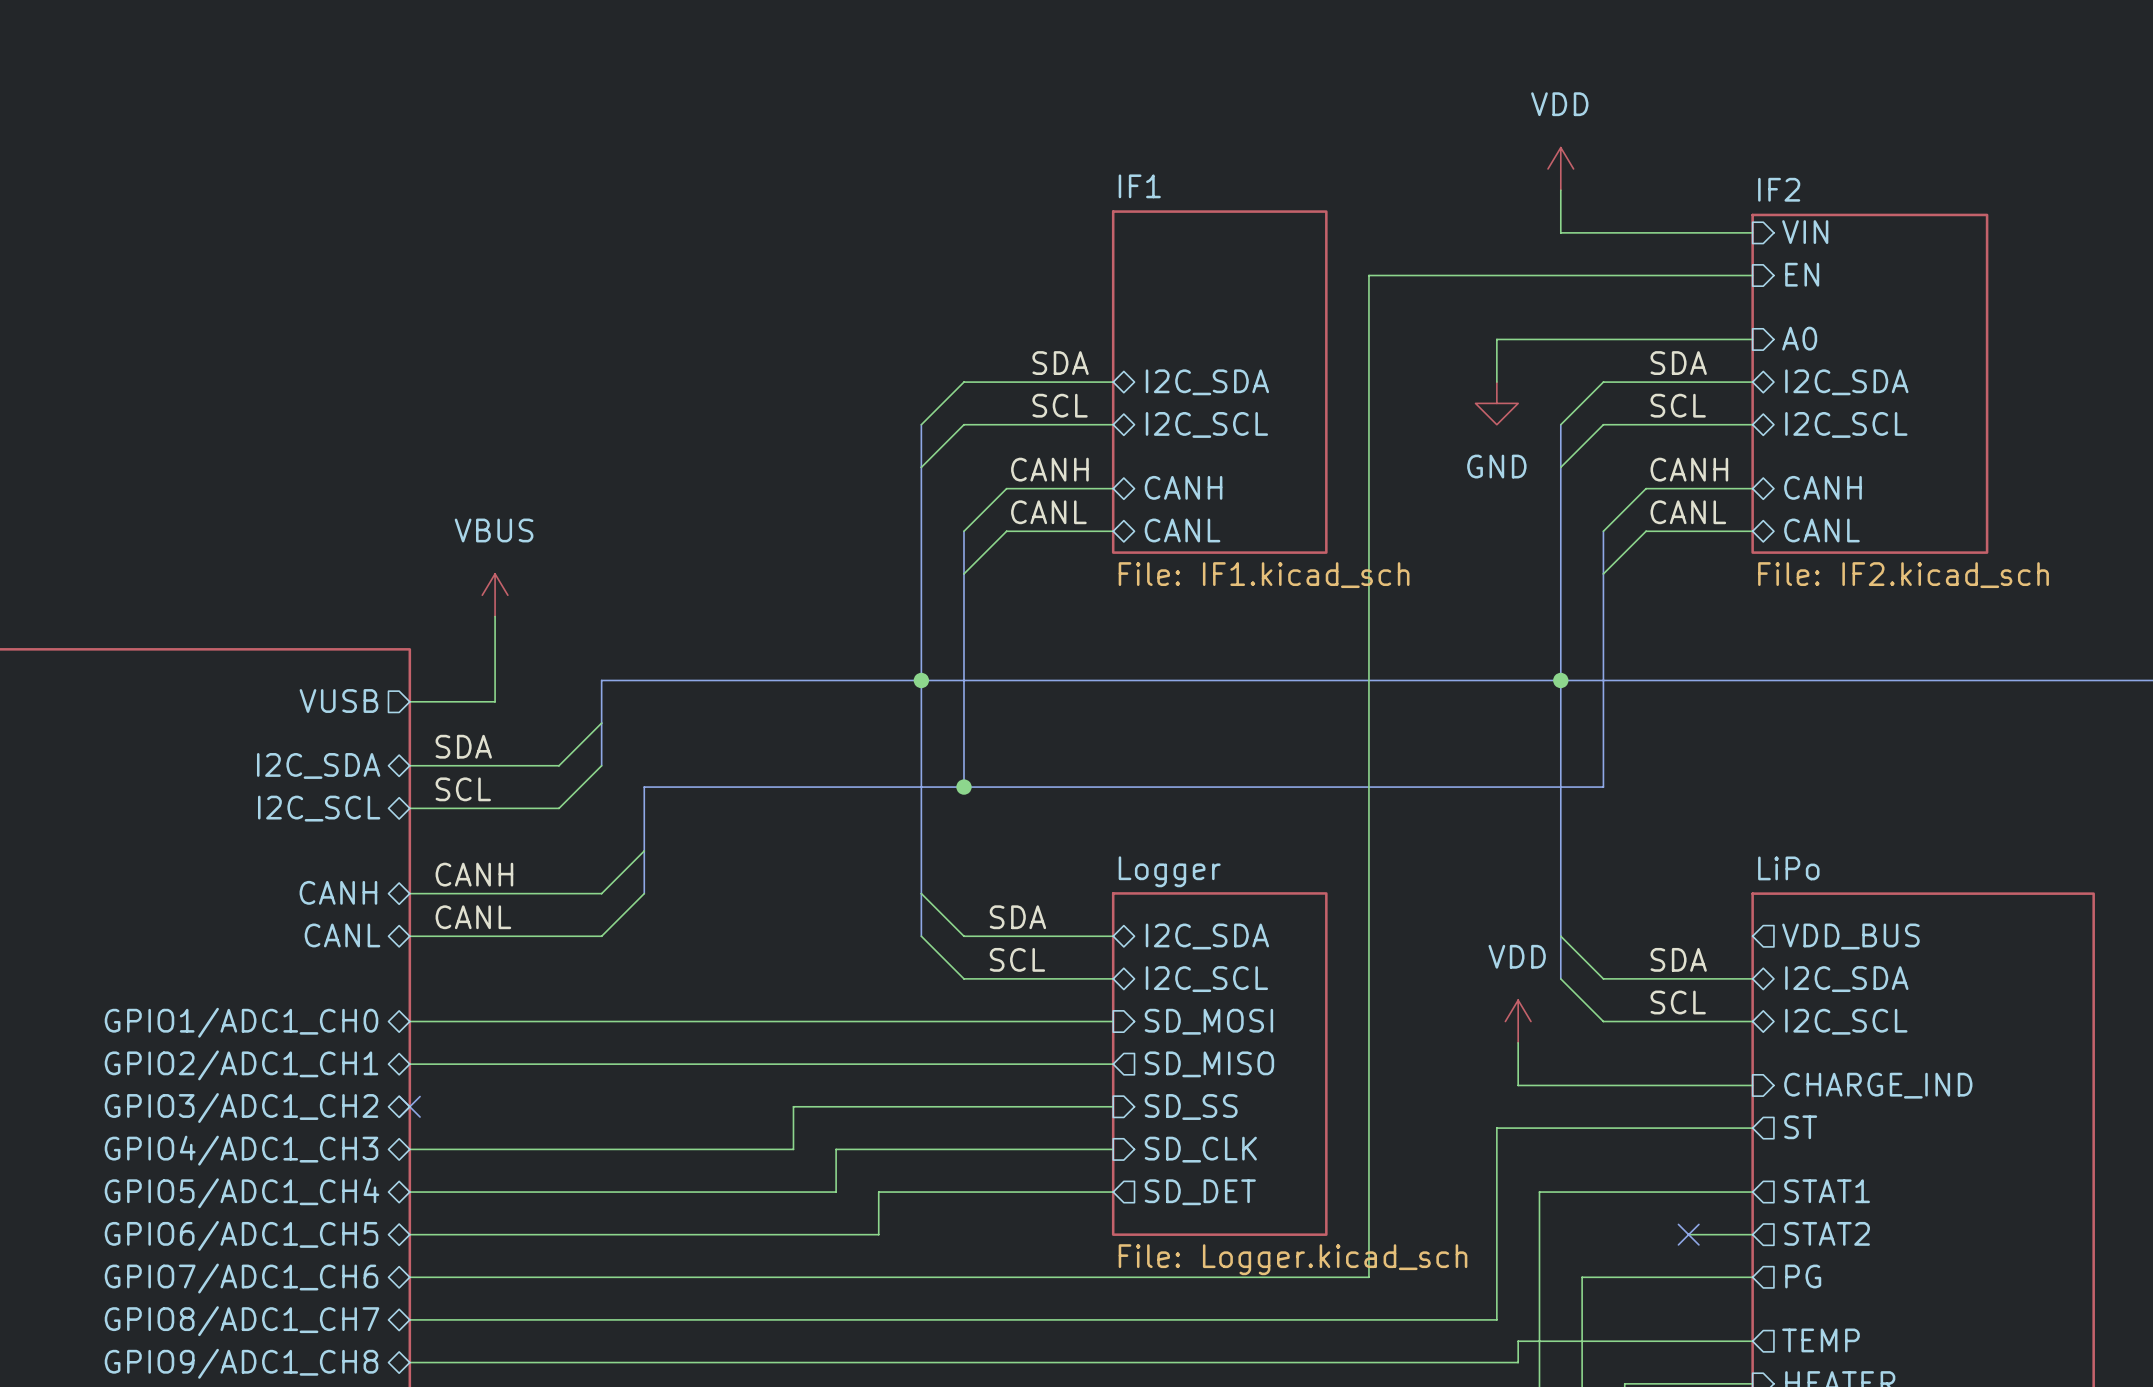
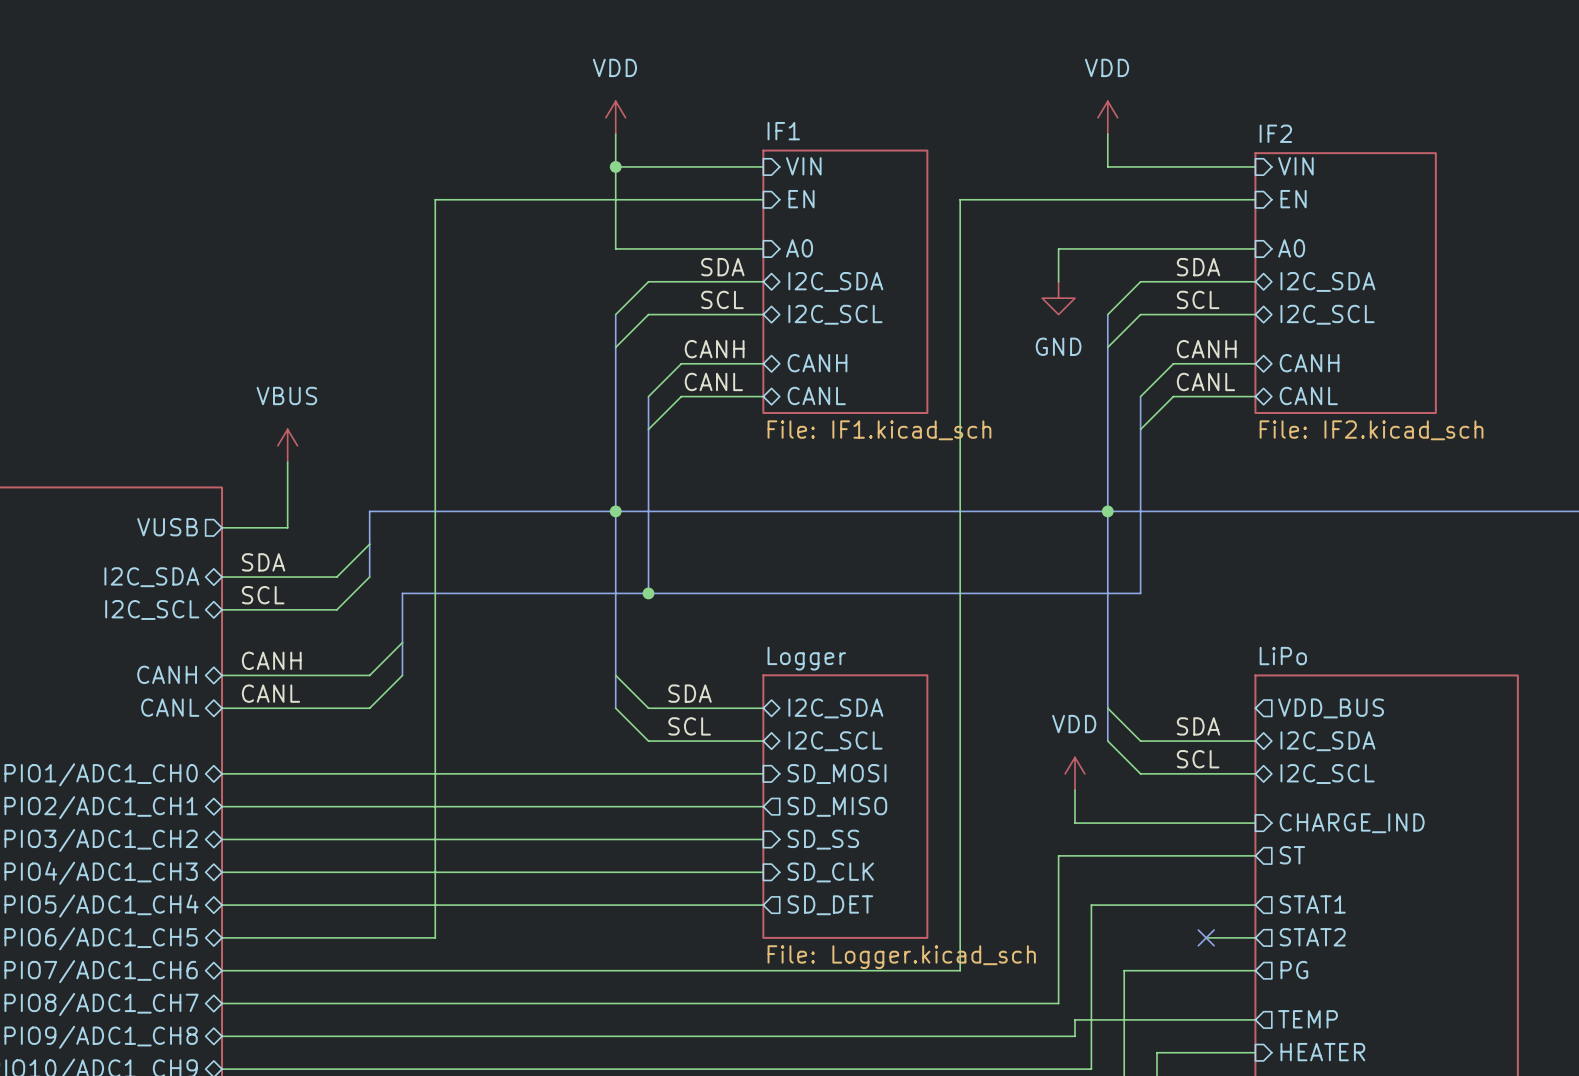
power symbol: none -> VDD (615, 117)
wire: none -> (615, 134) (615, 248) (763, 248)
wire: none -> (615, 166) (763, 166)
junction: none -> (615, 166)
sheet pin: none -> VIN (803, 166)
sheet pin: none -> EN (801, 199)
sheet pin: none -> A0 (799, 248)
wire: none -> (222, 839) (517, 839)
no-connect mark: (409, 1106) -> none
wire: (793, 1106) (793, 1149) -> (550, 872) (517, 872)
wire: (836, 1149) (836, 1192) -> (582, 905) (550, 905)
wire: (878, 1192) (878, 1234) (686, 1234) -> (763, 199) (435, 199) (435, 937)

